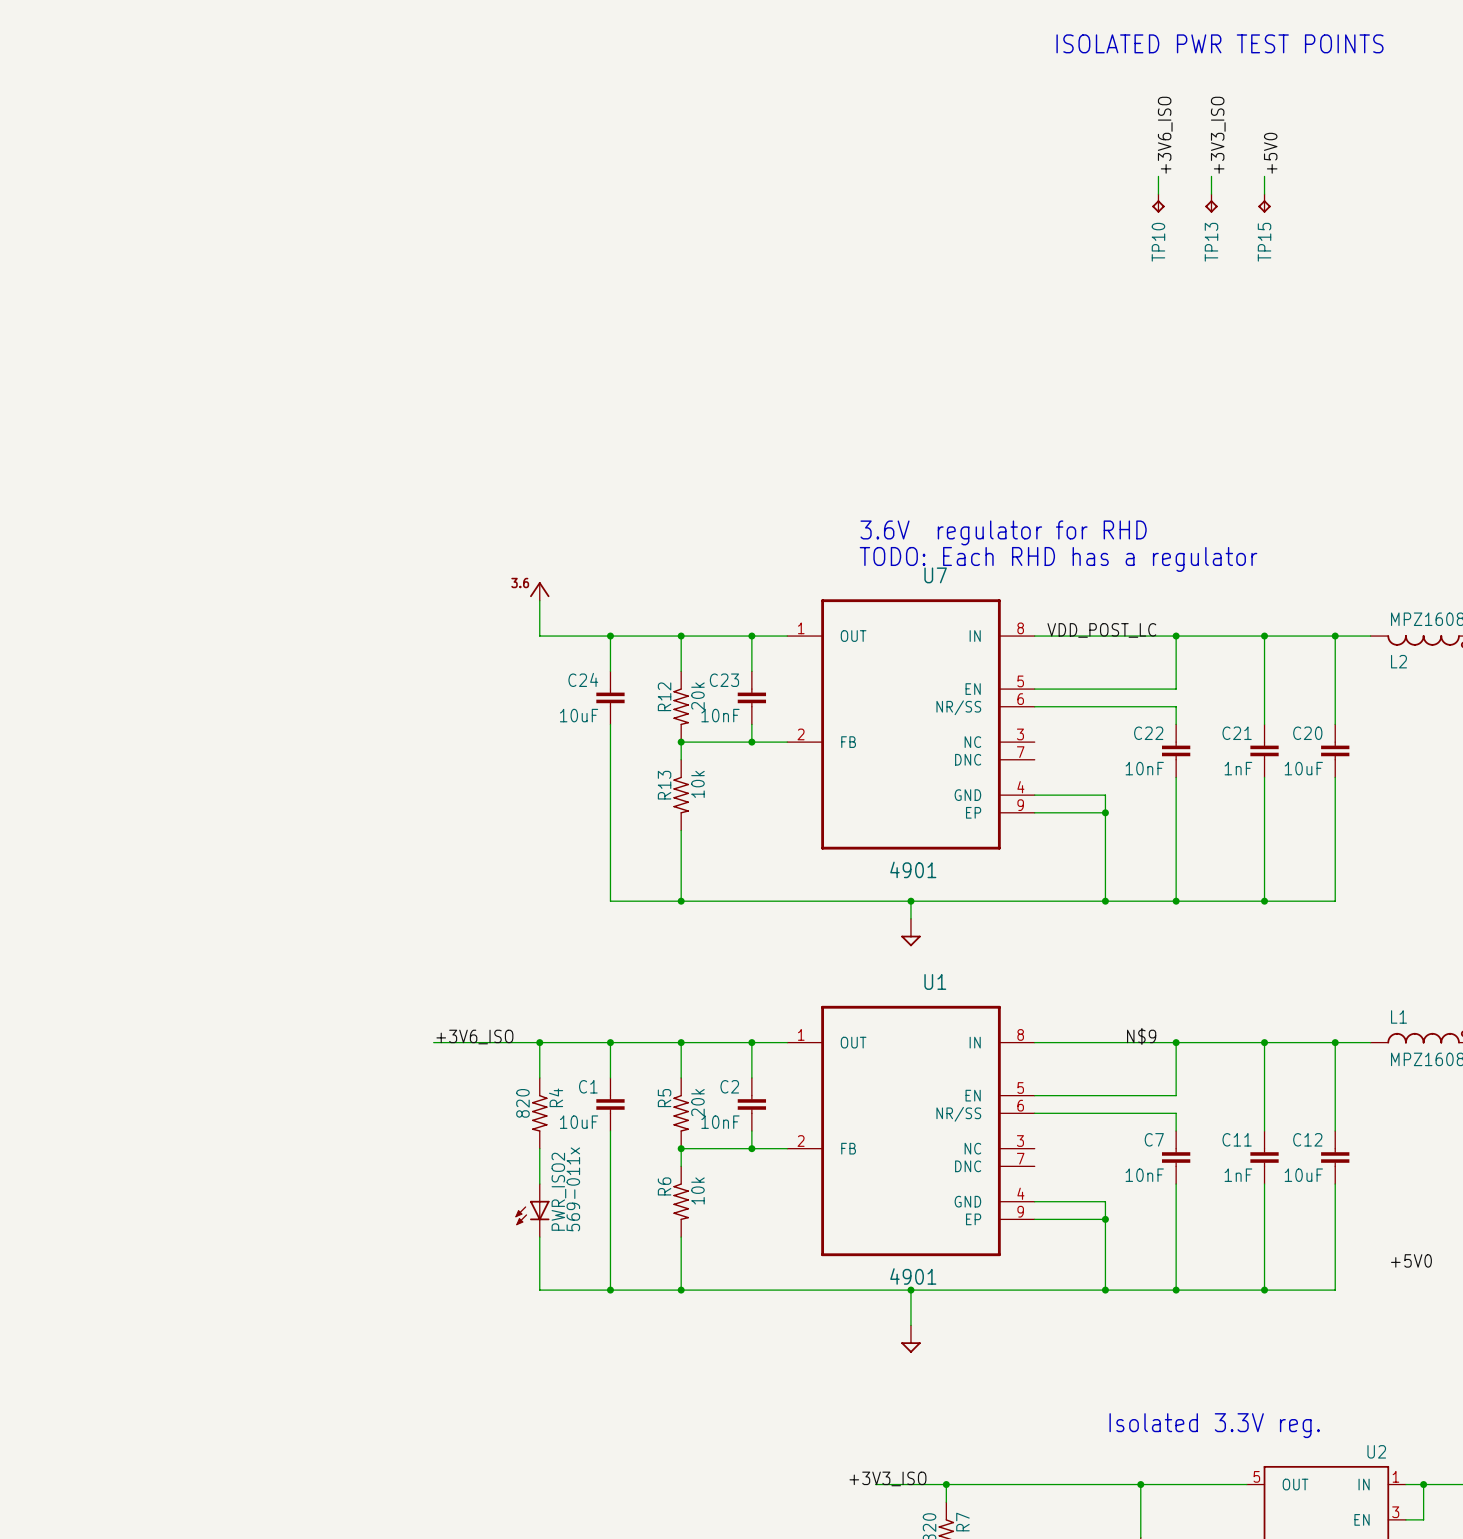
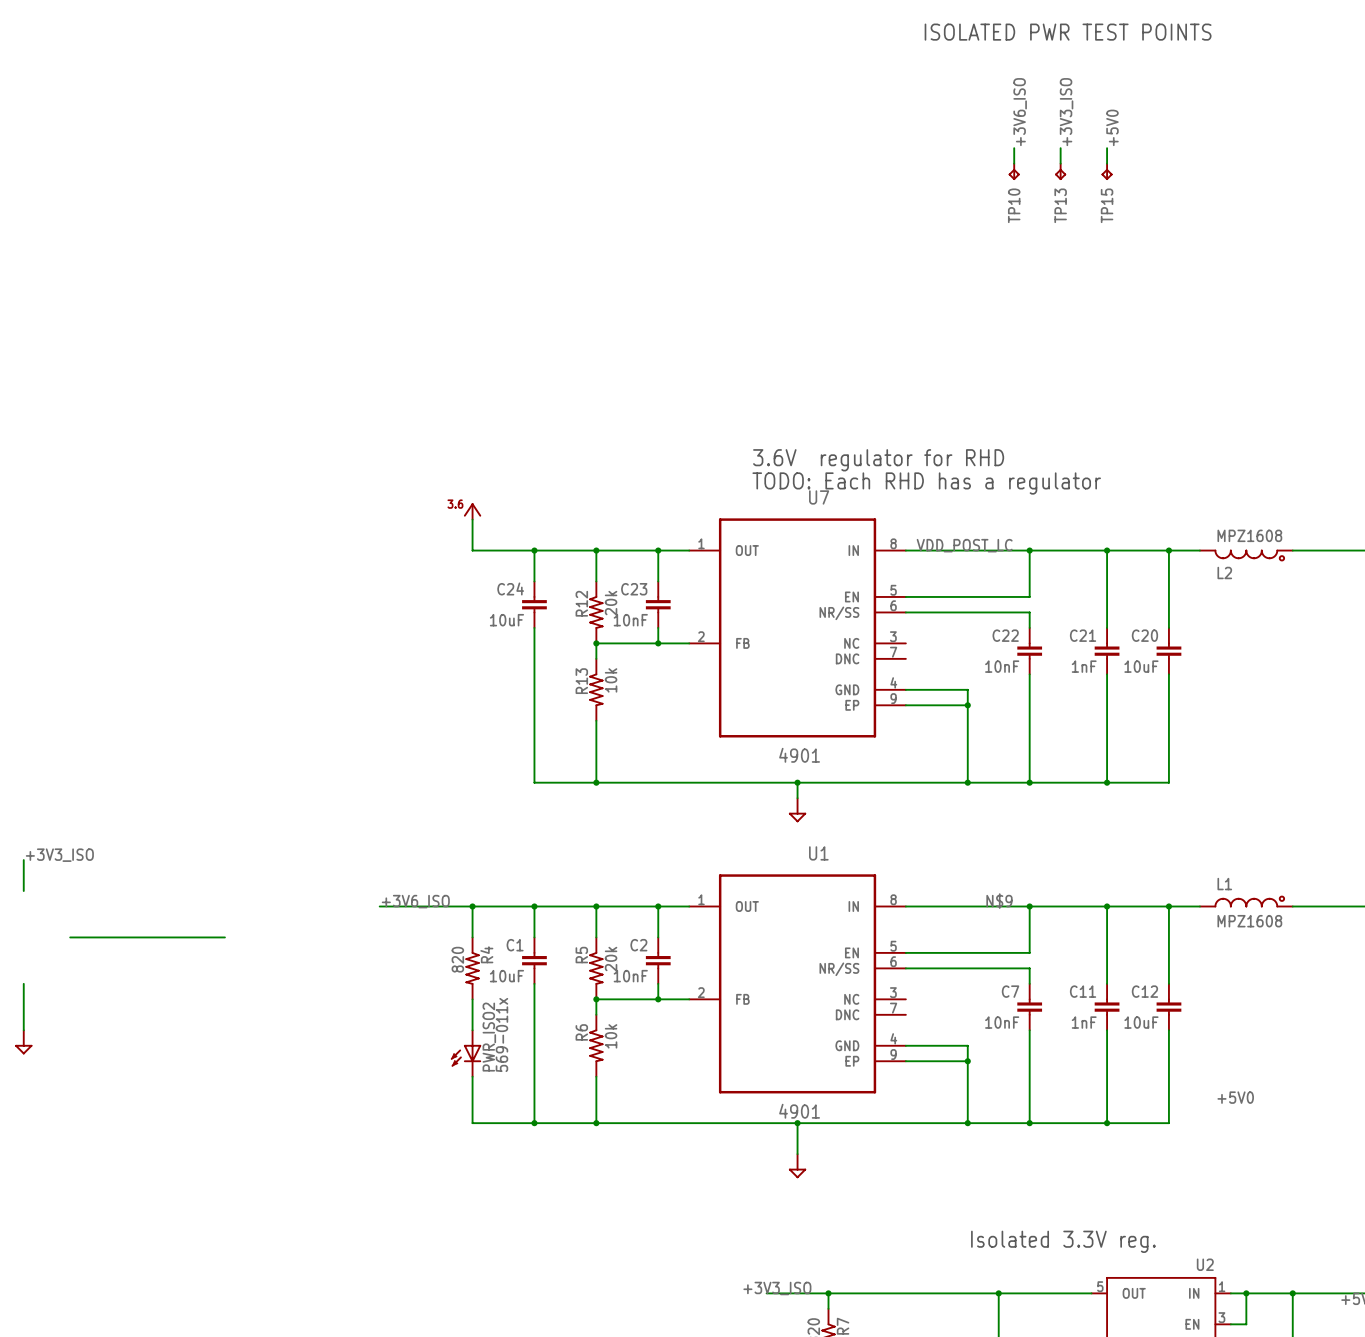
label: none -> +3V3_ISO (59, 855)
wire: none -> (23, 860) (23, 891)
wire: none -> (70, 937) (224, 937)
wire: none -> (23, 983) (23, 1030)
power symbol: none -> (23, 1042)

